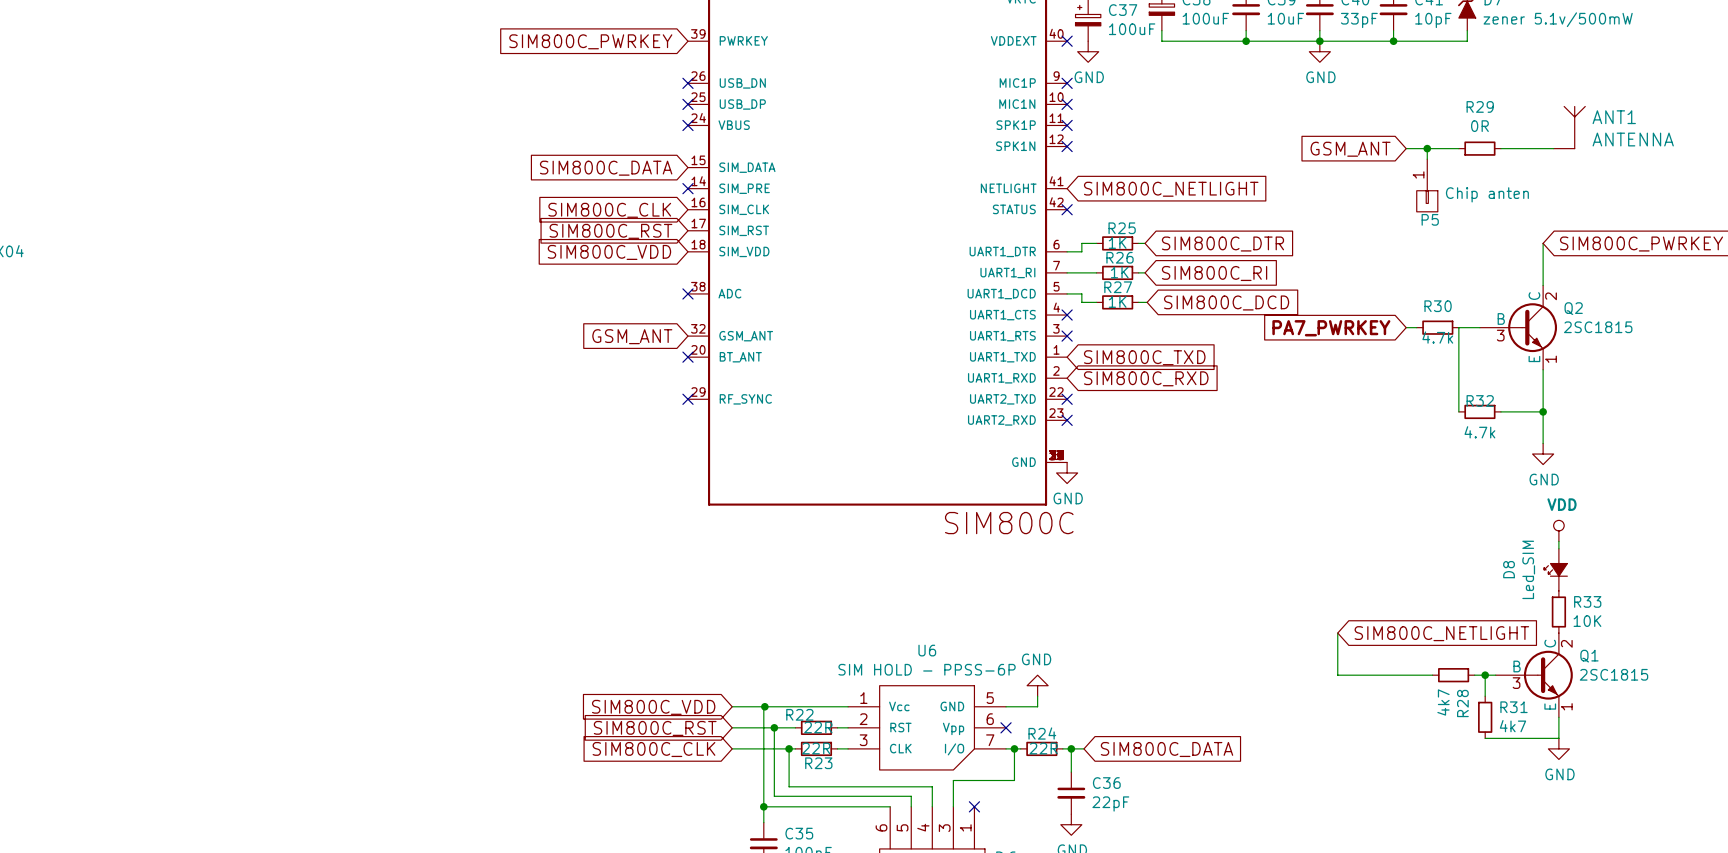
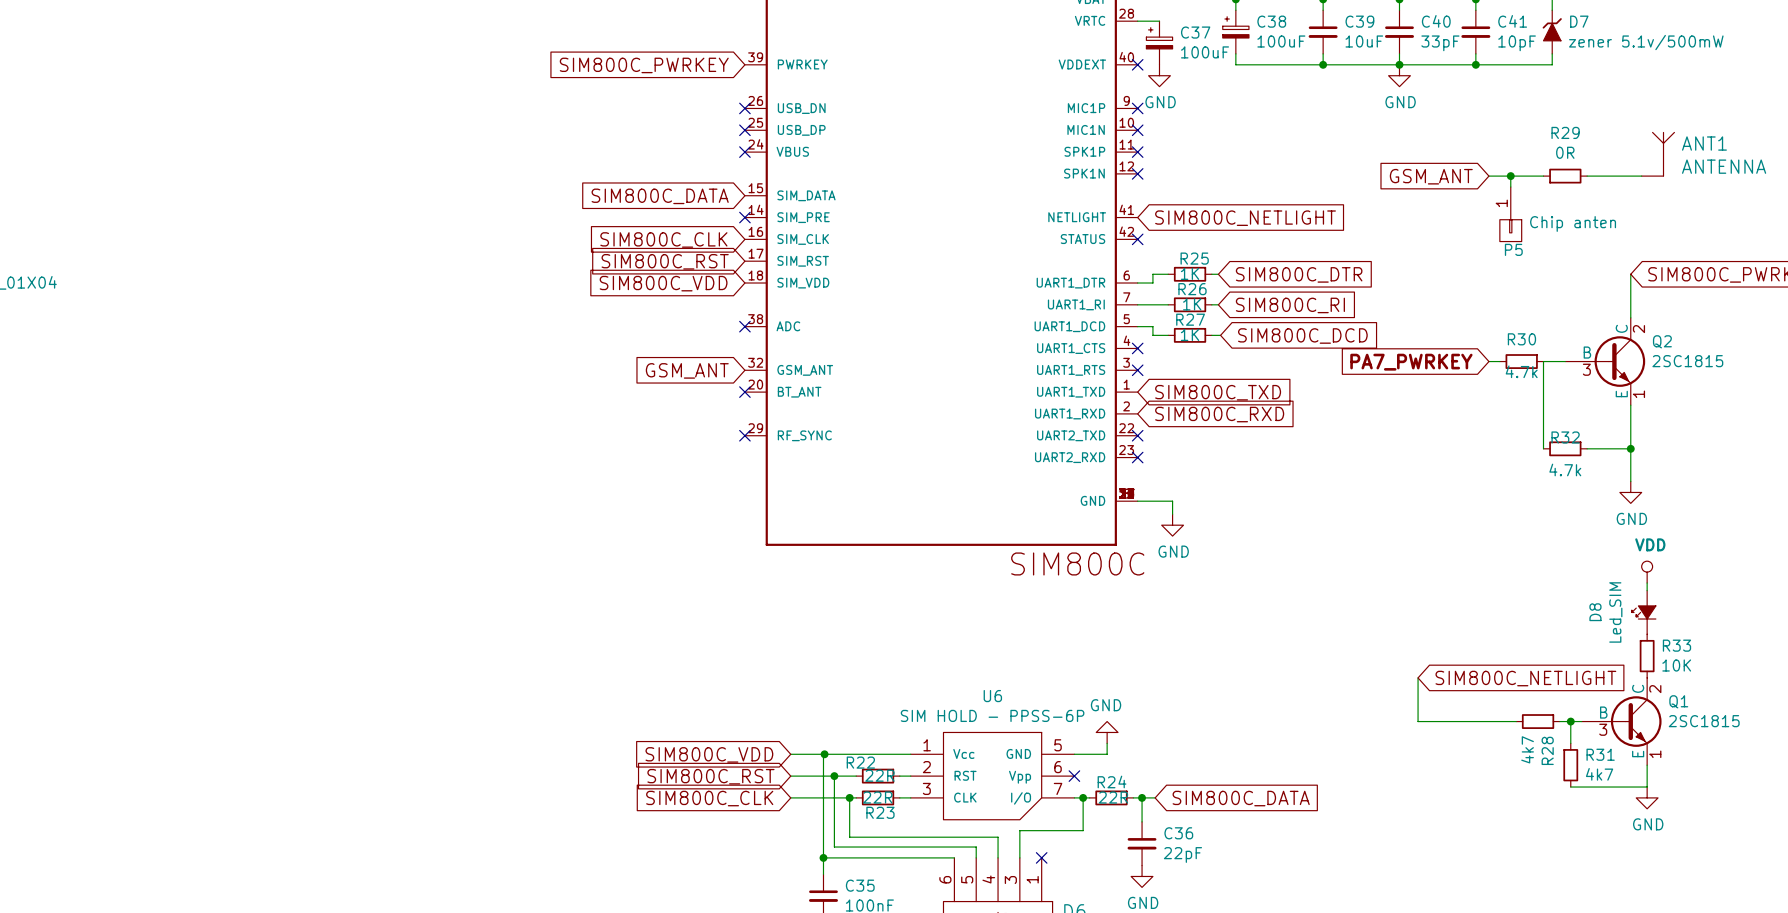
wire: none -> (1137, 501) (1172, 501) (1172, 514)
power symbol position: GND (1067, 472) -> GND (1172, 525)

